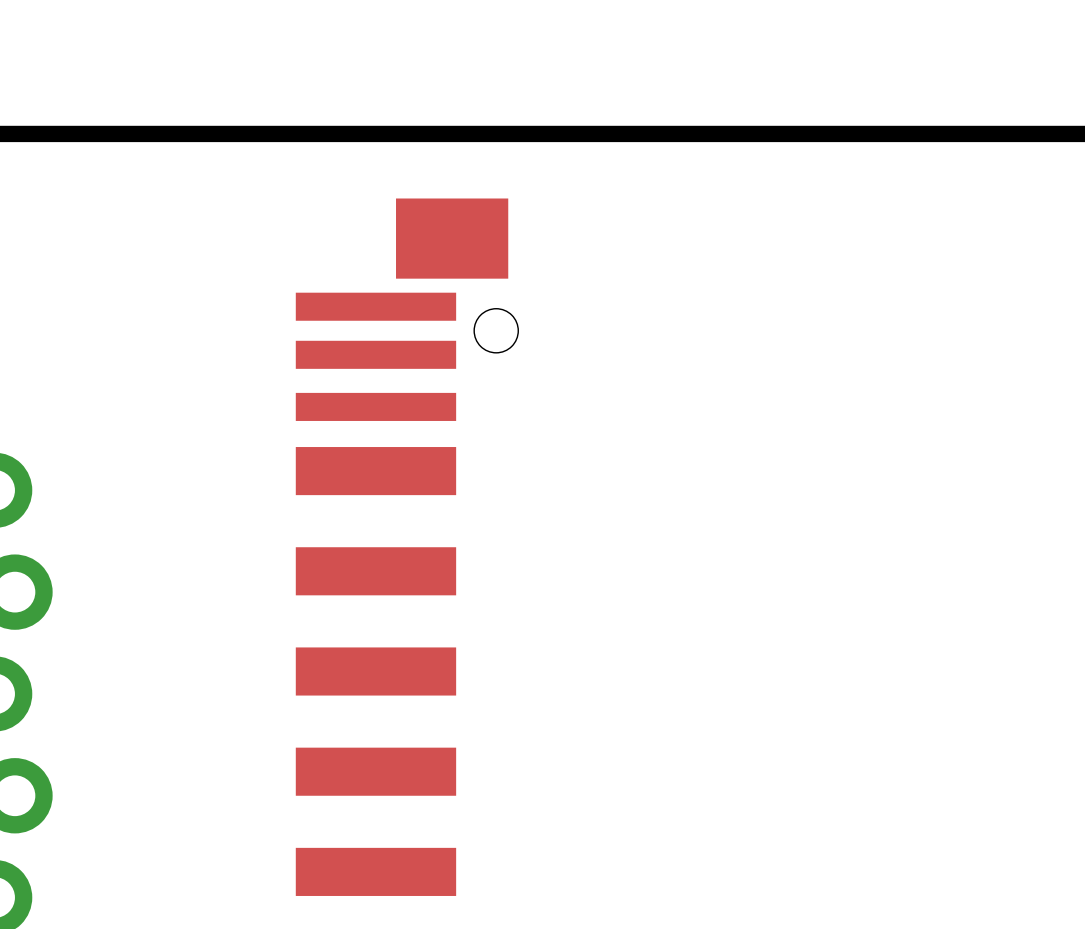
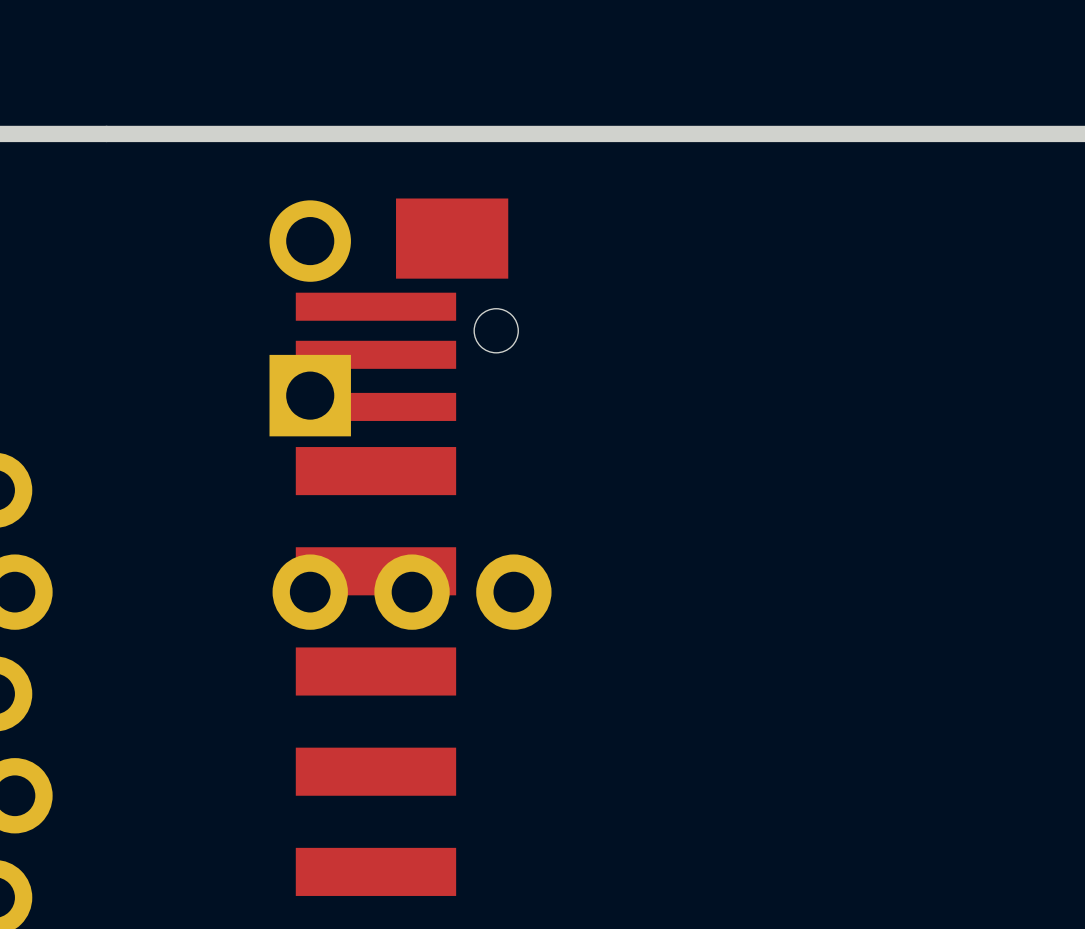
part: none -> (310, 318)
part: none -> (412, 592)

